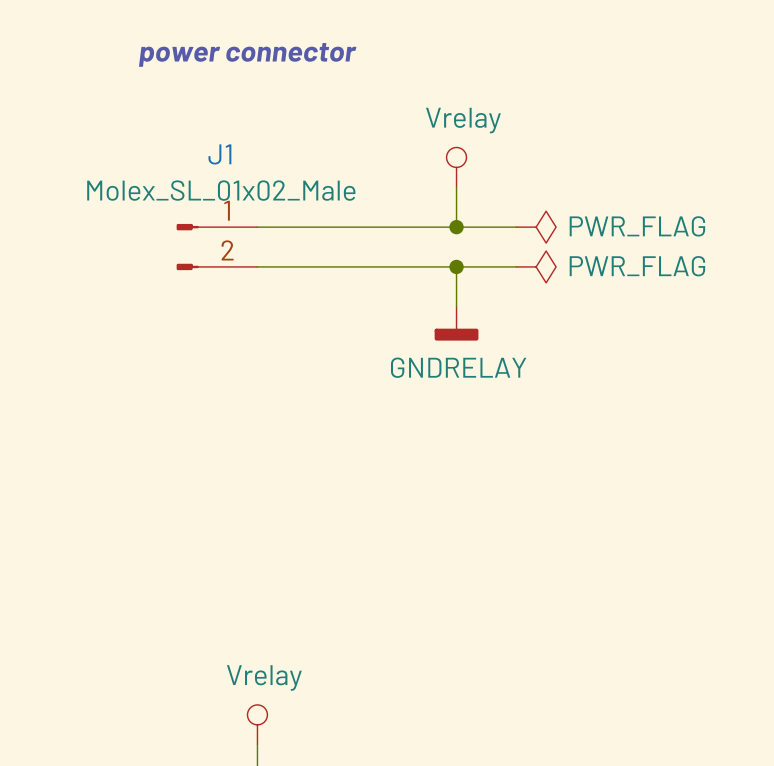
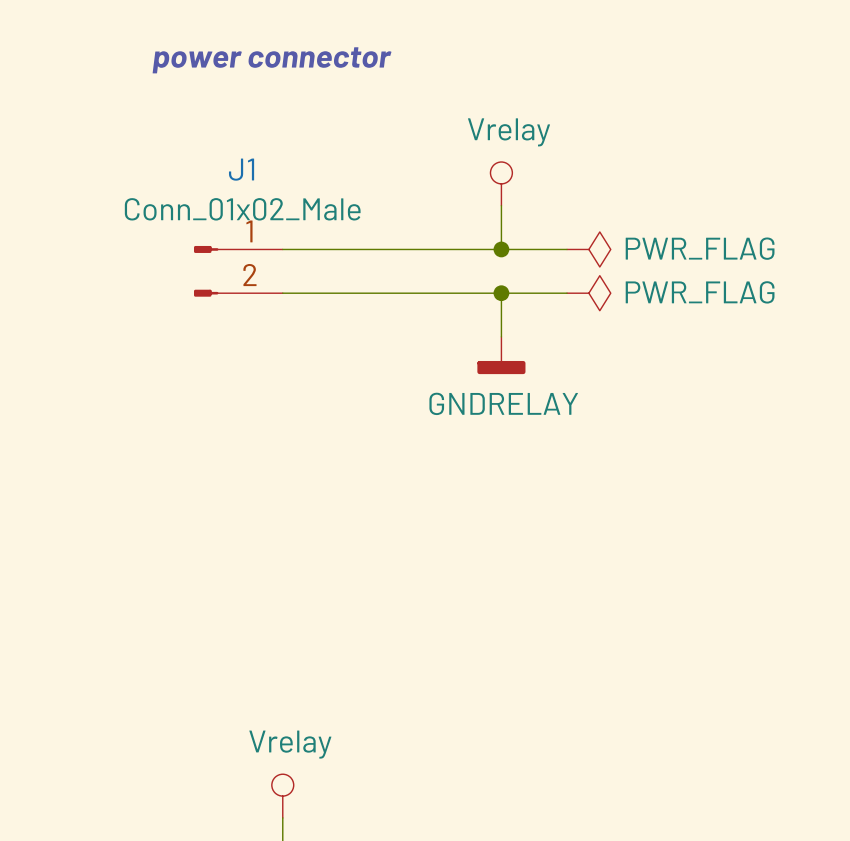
J1 value: Molex_SL_01x02_Male (221, 190) -> Conn_01x02_Male (242, 209)

